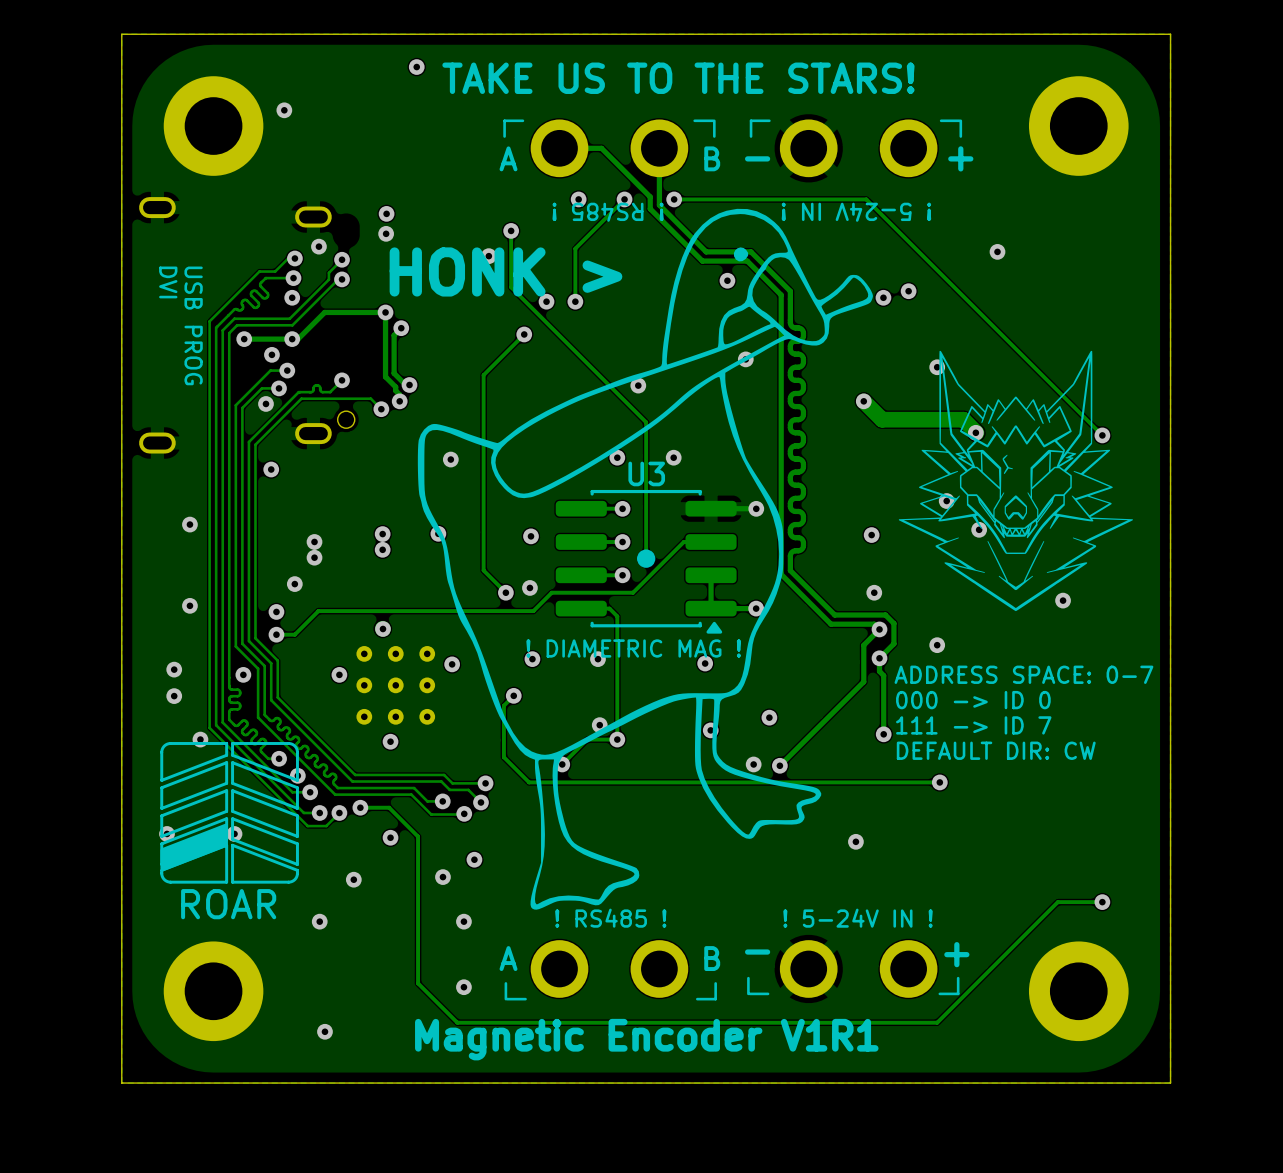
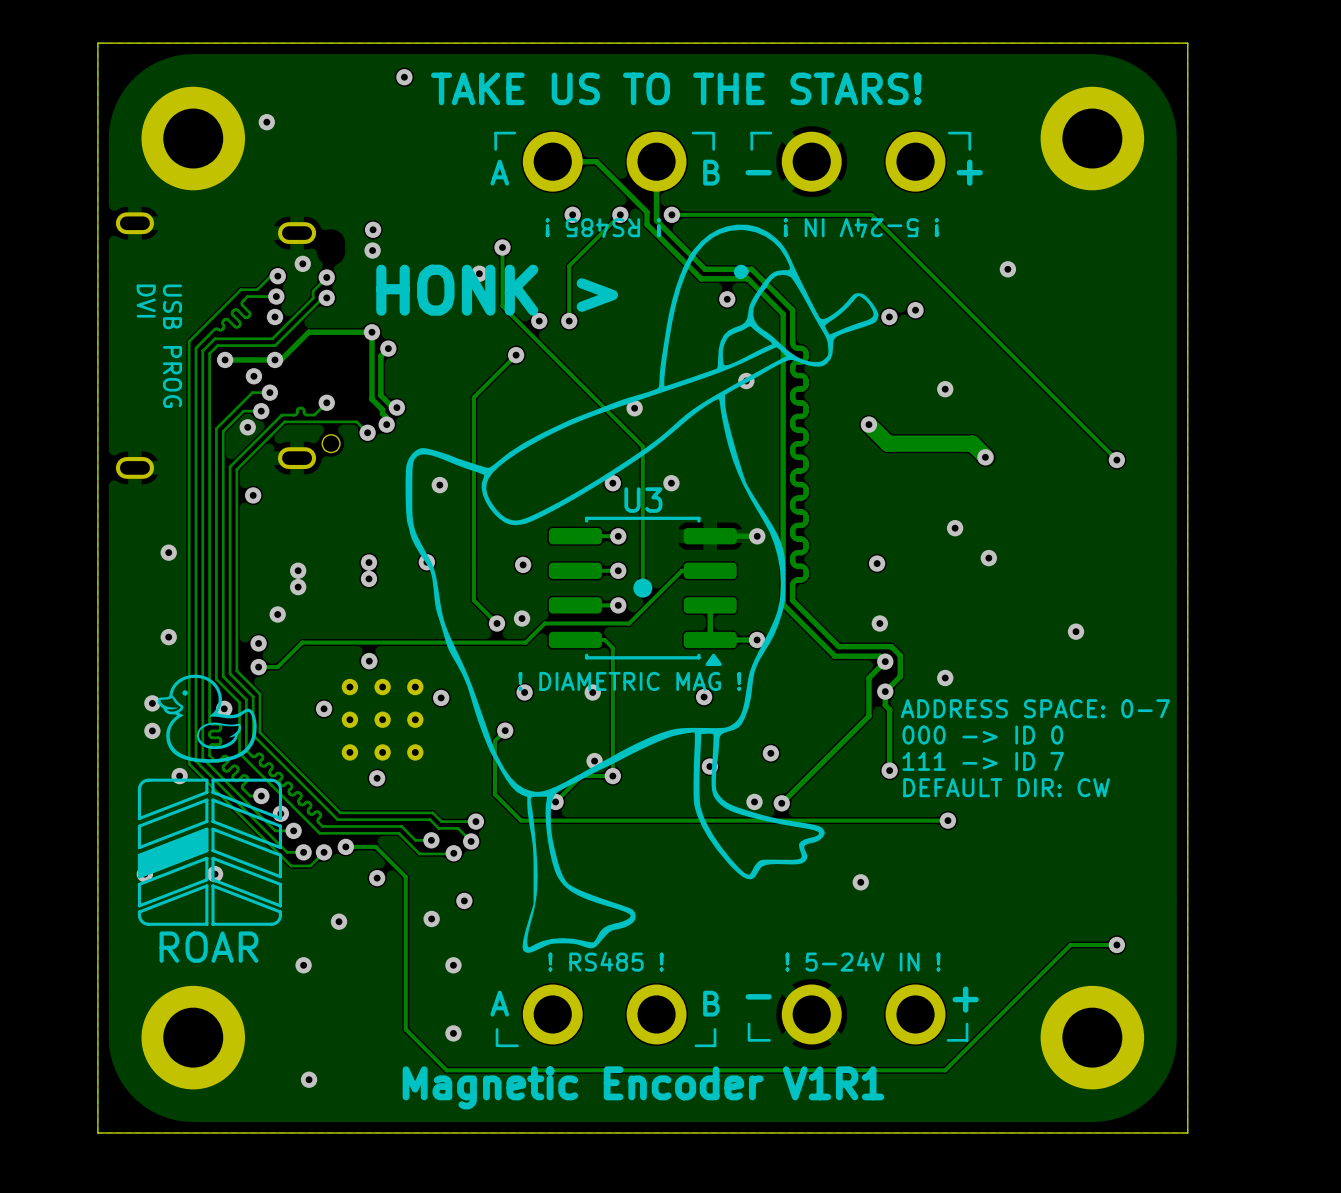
drawing: [898, 350, 1133, 612] -> none
drawing: none -> [157, 674, 257, 763]
drawing position: (194, 847) -> (173, 852)

